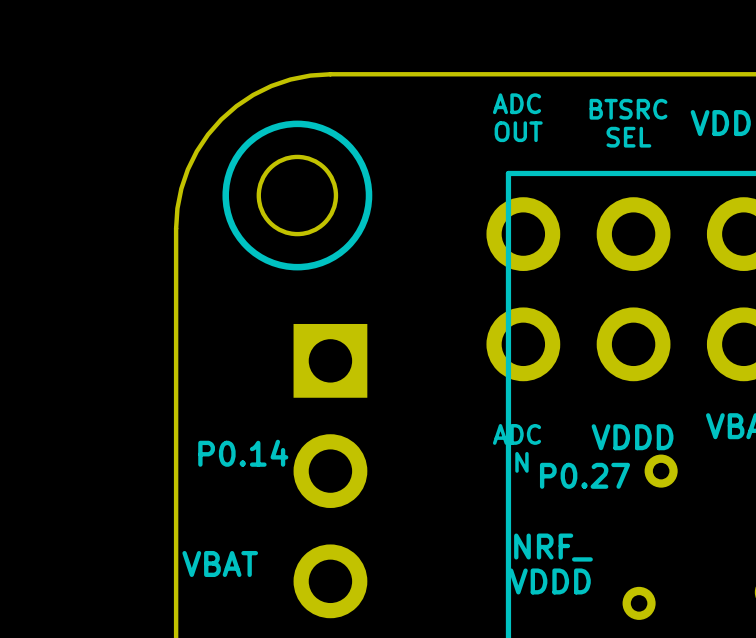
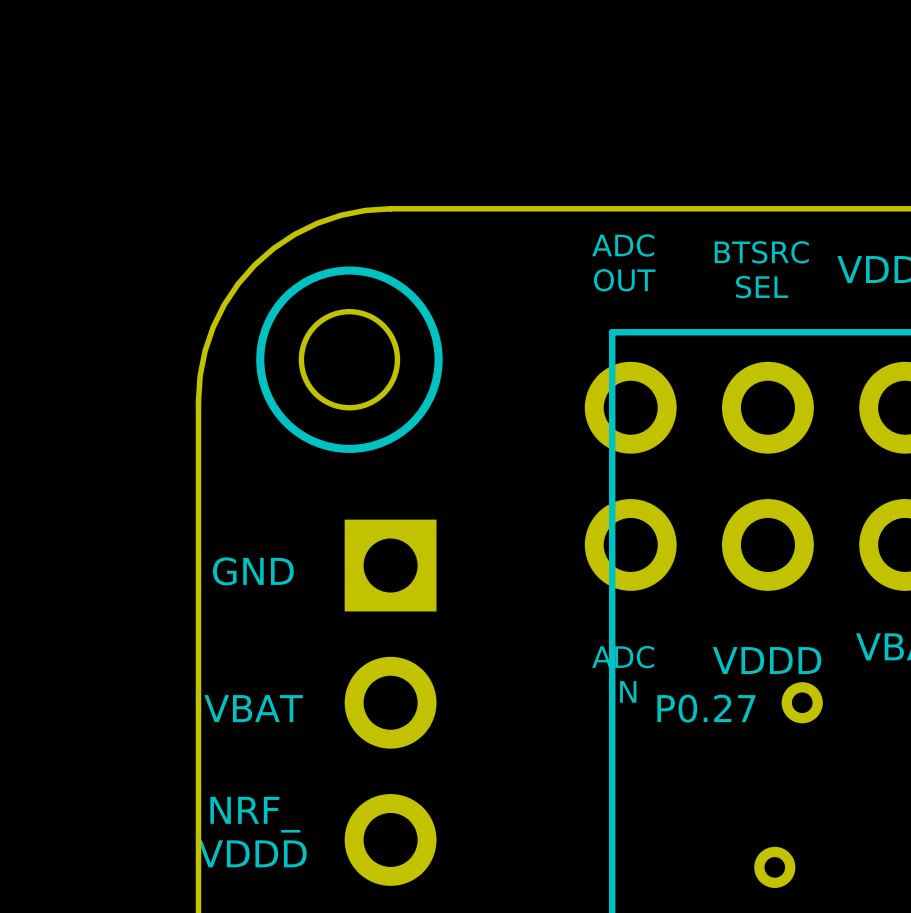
text: none -> GND (253, 571)
text: P0.14 (243, 453) -> none
text: NRF_ (553, 547) -> none
text: none -> NRF_ (255, 814)
text position: VBAT (220, 563) -> VBAT (253, 708)
text position: VDDD (549, 581) -> VDDD (252, 853)

